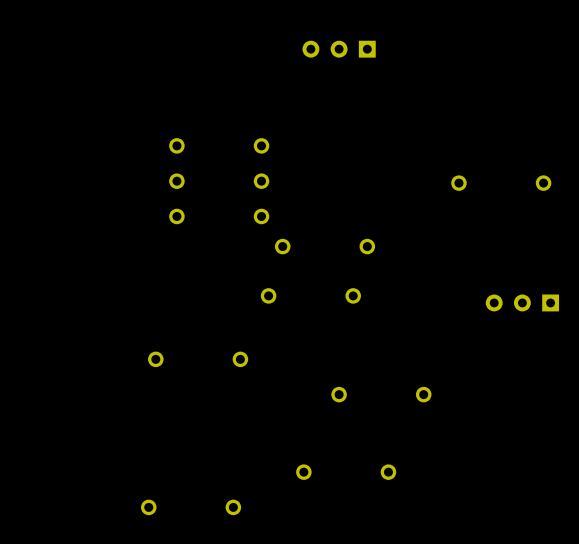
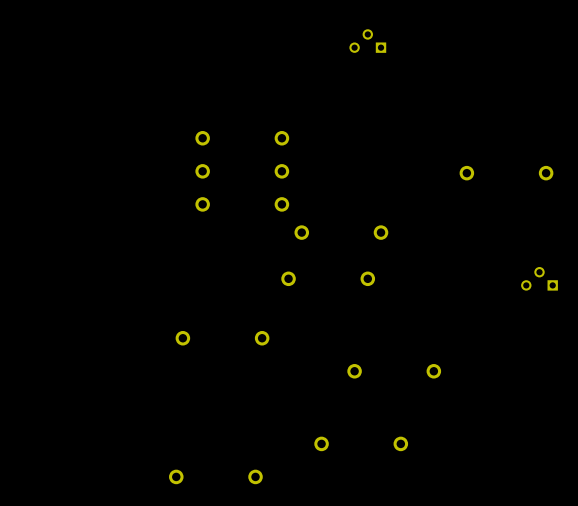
part: none -> (367, 41)
part: (339, 49) -> none
part: none -> (539, 278)
part: (522, 302) -> none

